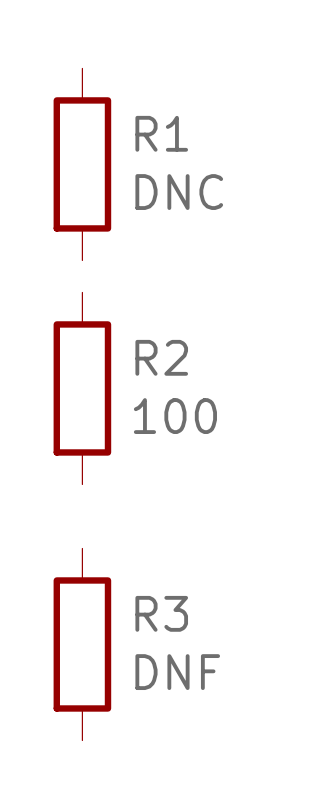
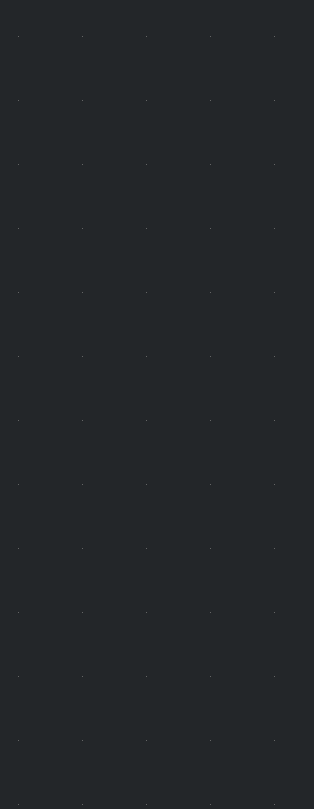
R1: DNC (82, 164) -> none
R2: 100 (82, 388) -> none
R3: DNF (82, 644) -> none

